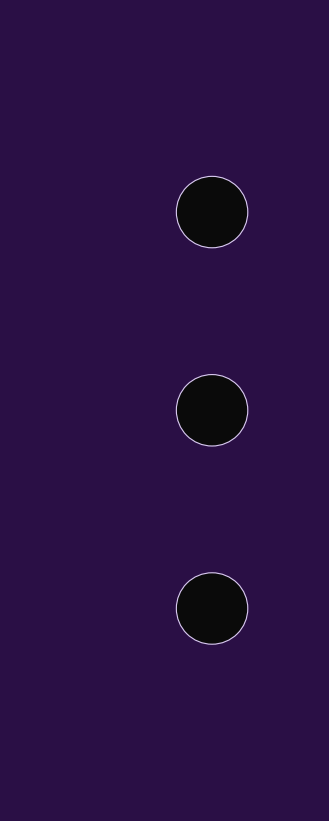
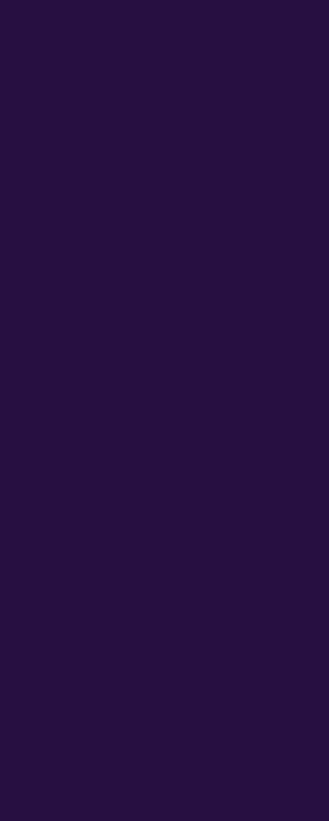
part: (212, 212) -> none
part: (212, 410) -> none
part: (212, 608) -> none

